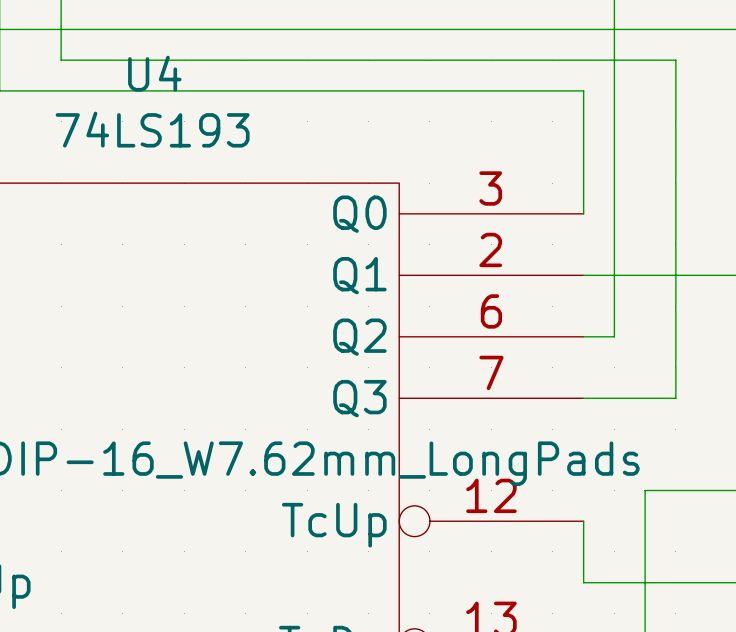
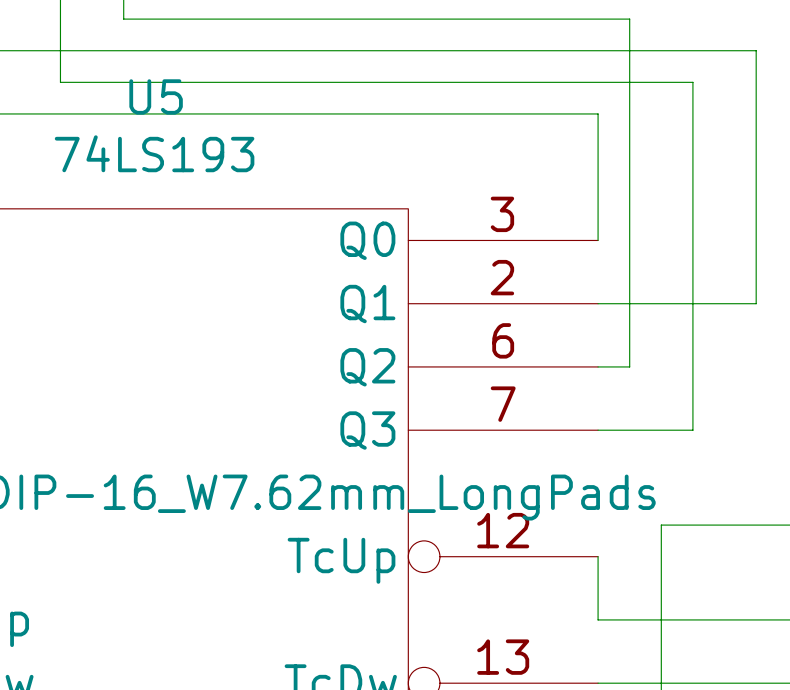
U4 name: U4 (154, 73) -> U5 (156, 96)

